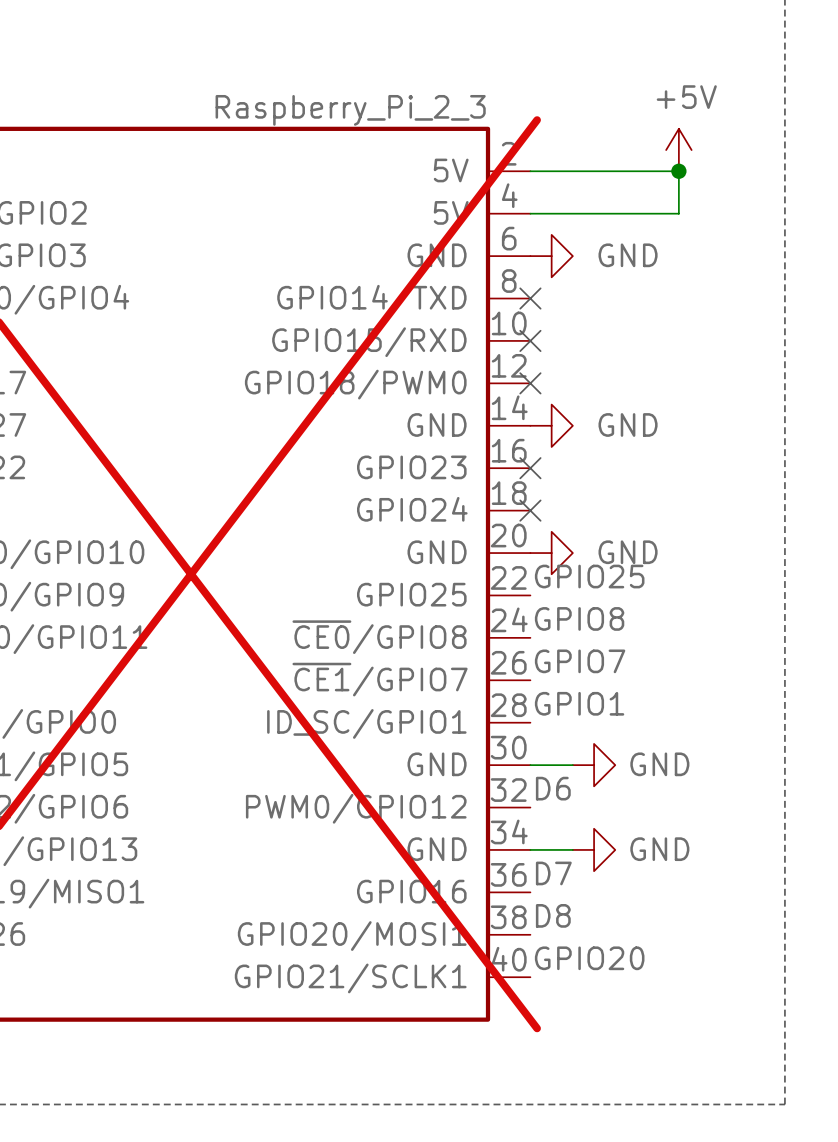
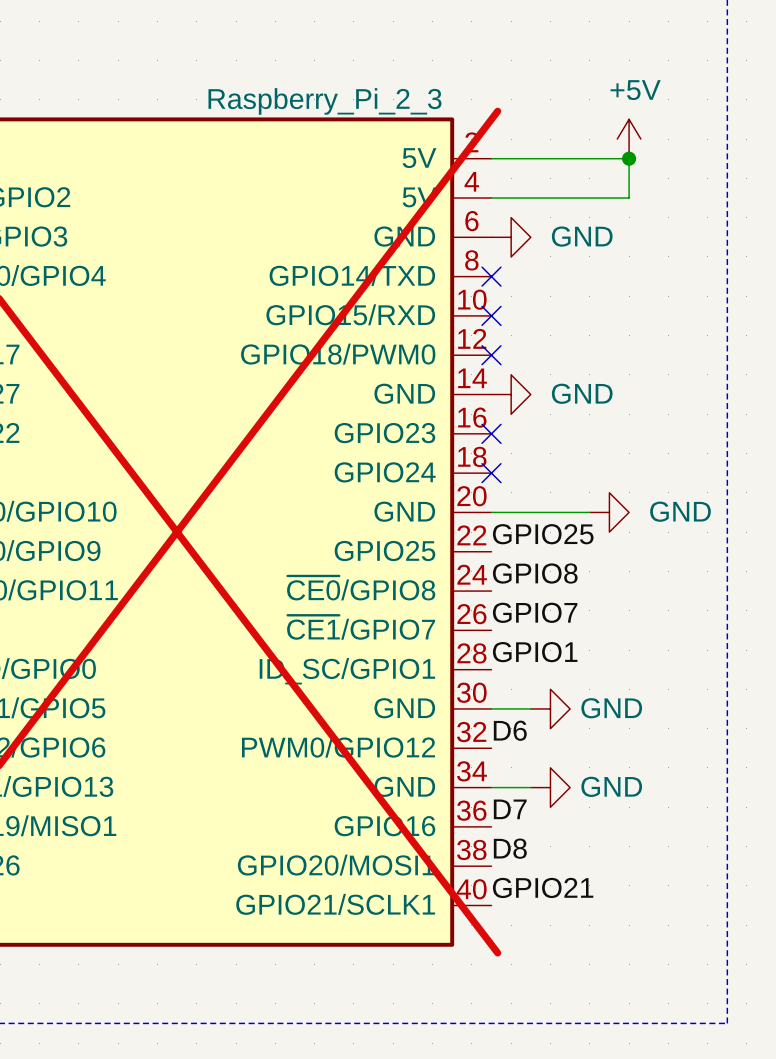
wire: none -> (491, 512) (589, 512)
power symbol position: GND (551, 553) -> GND (609, 512)
label: GPIO20 (589, 958) -> GPIO21 (543, 887)

